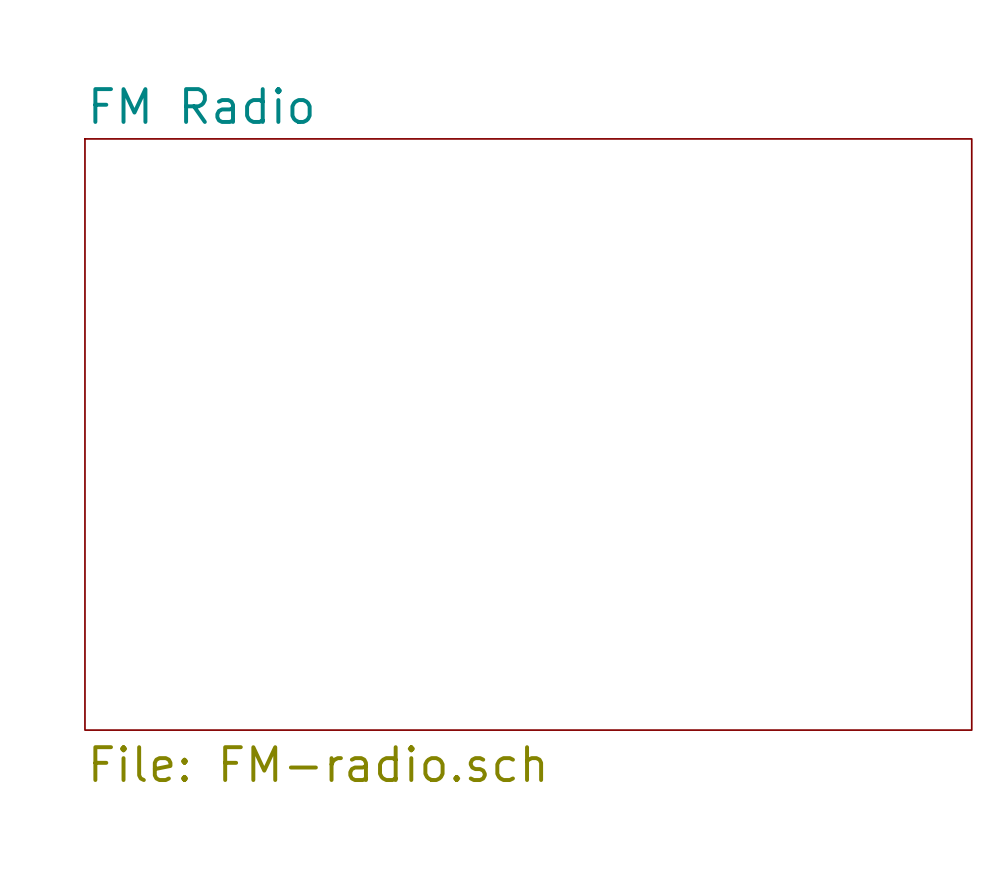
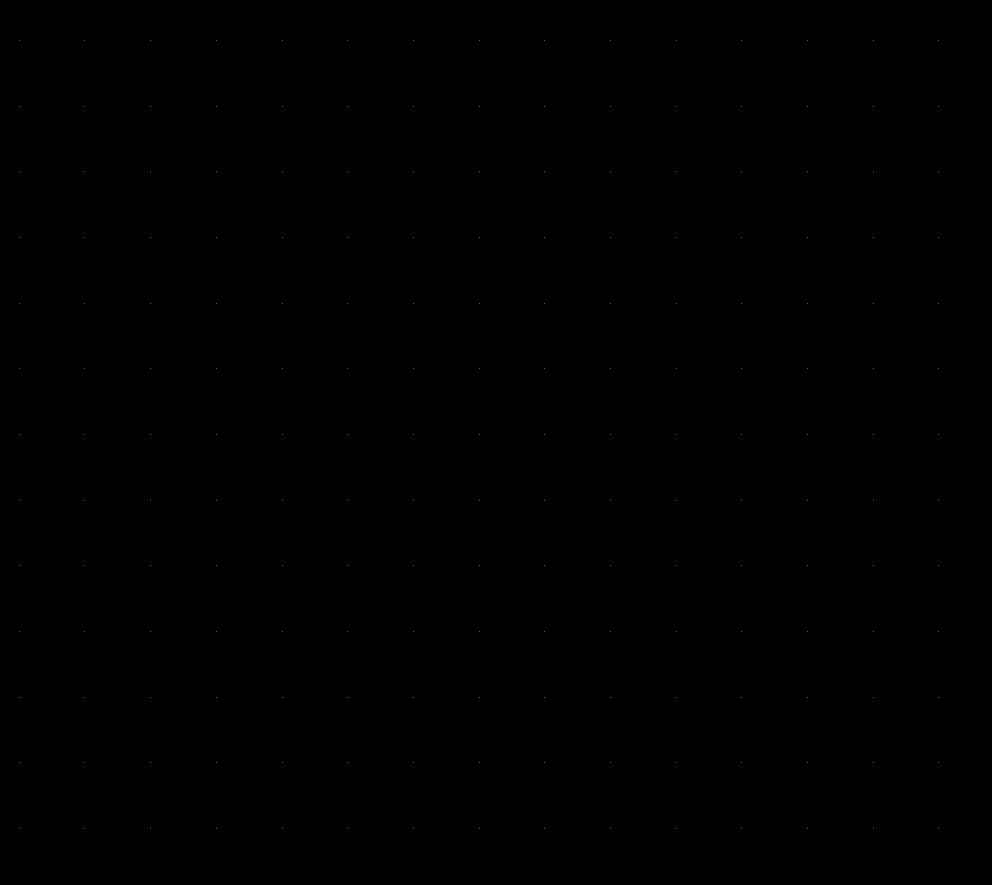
sheet FM Radio: File: FM-radio.sch (528, 434) -> none

